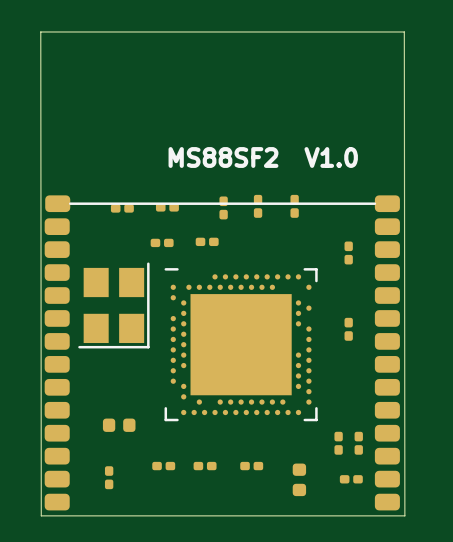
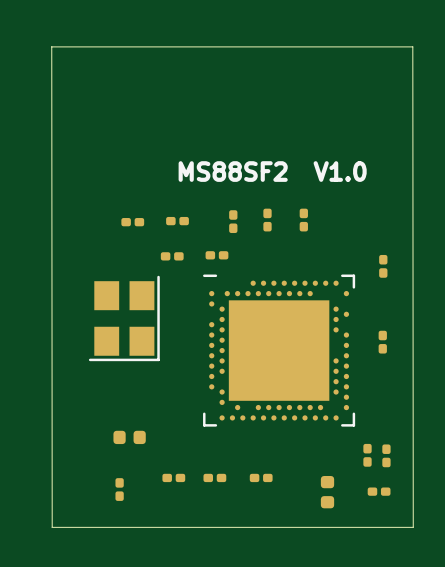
part position: (348, 252) -> (383, 266)
part position: (348, 329) -> (382, 342)
part position: (241, 344) -> (279, 350)
part: (222, 352) -> none
part: (338, 443) -> none
part: none -> (386, 455)
part position: (299, 479) -> (327, 492)
part position: (351, 479) -> (379, 491)

